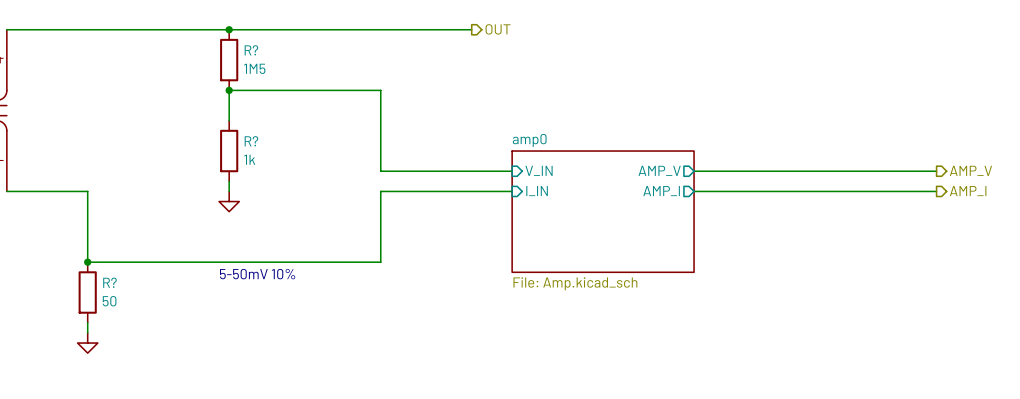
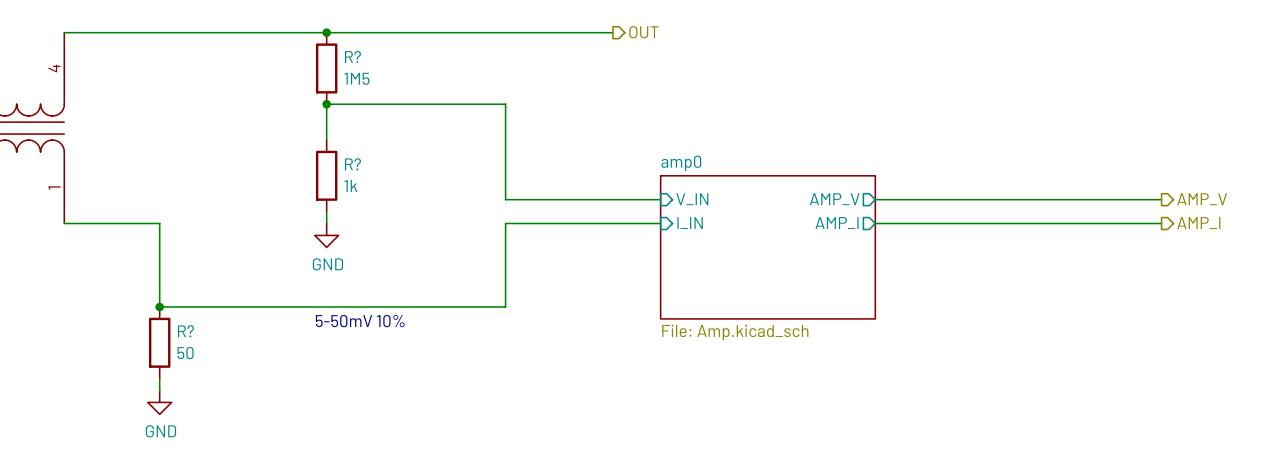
power symbol text: none -> GND (327, 264)
power symbol text: none -> GND (160, 431)

